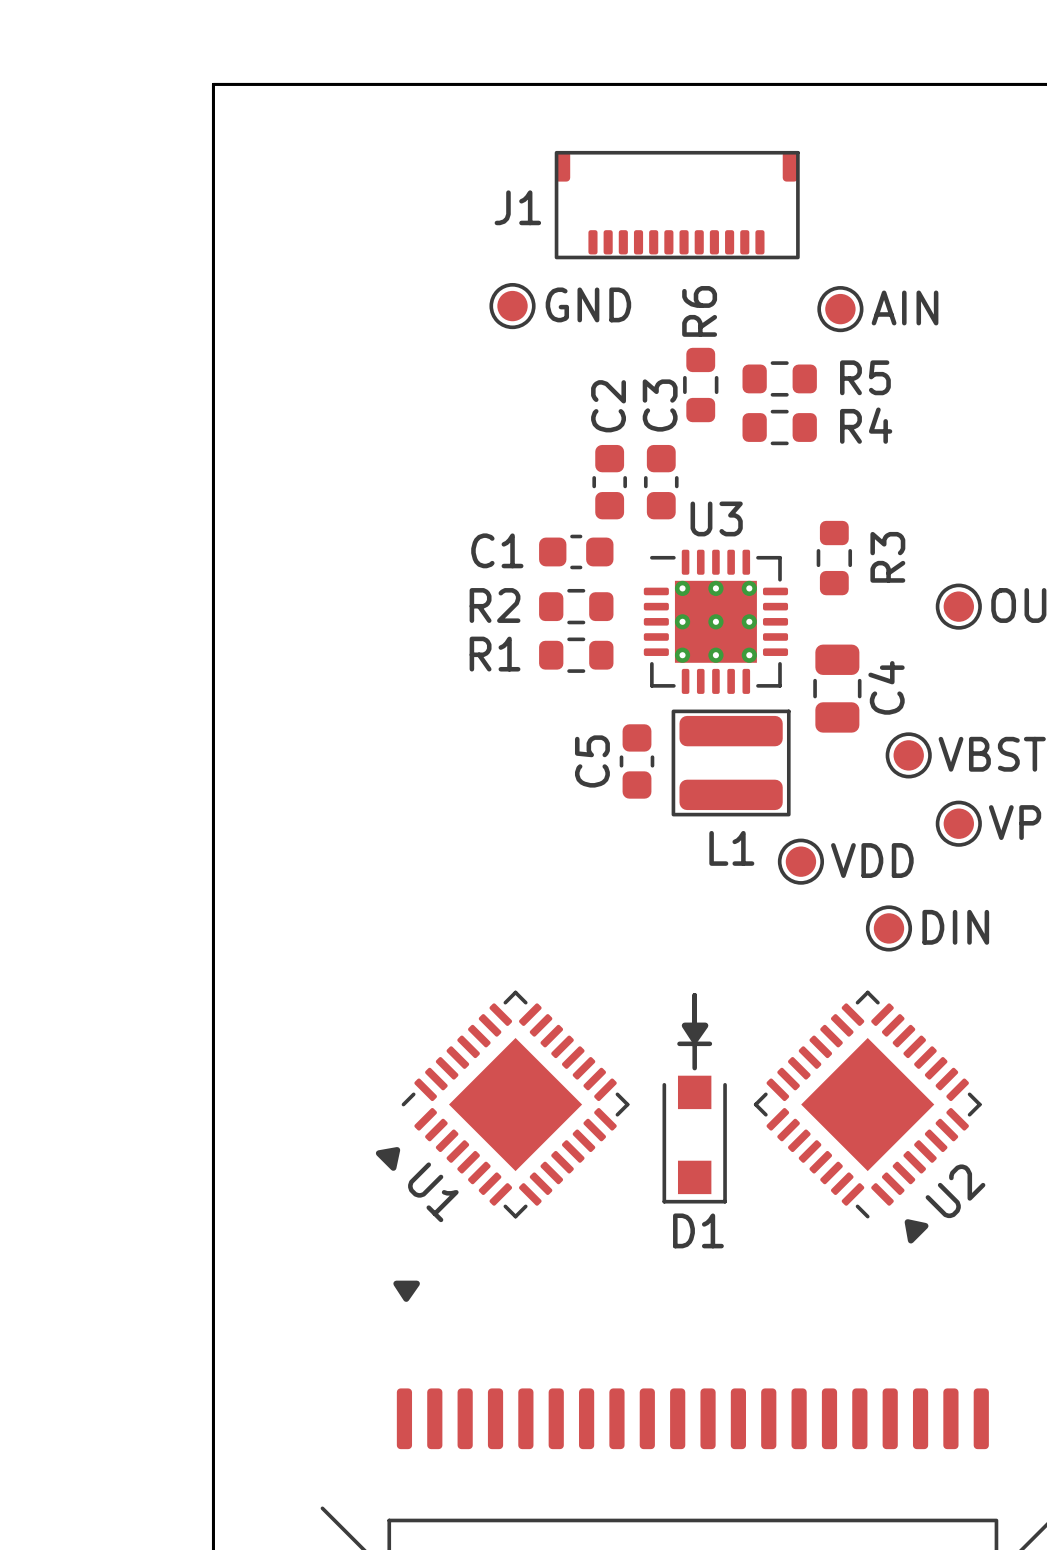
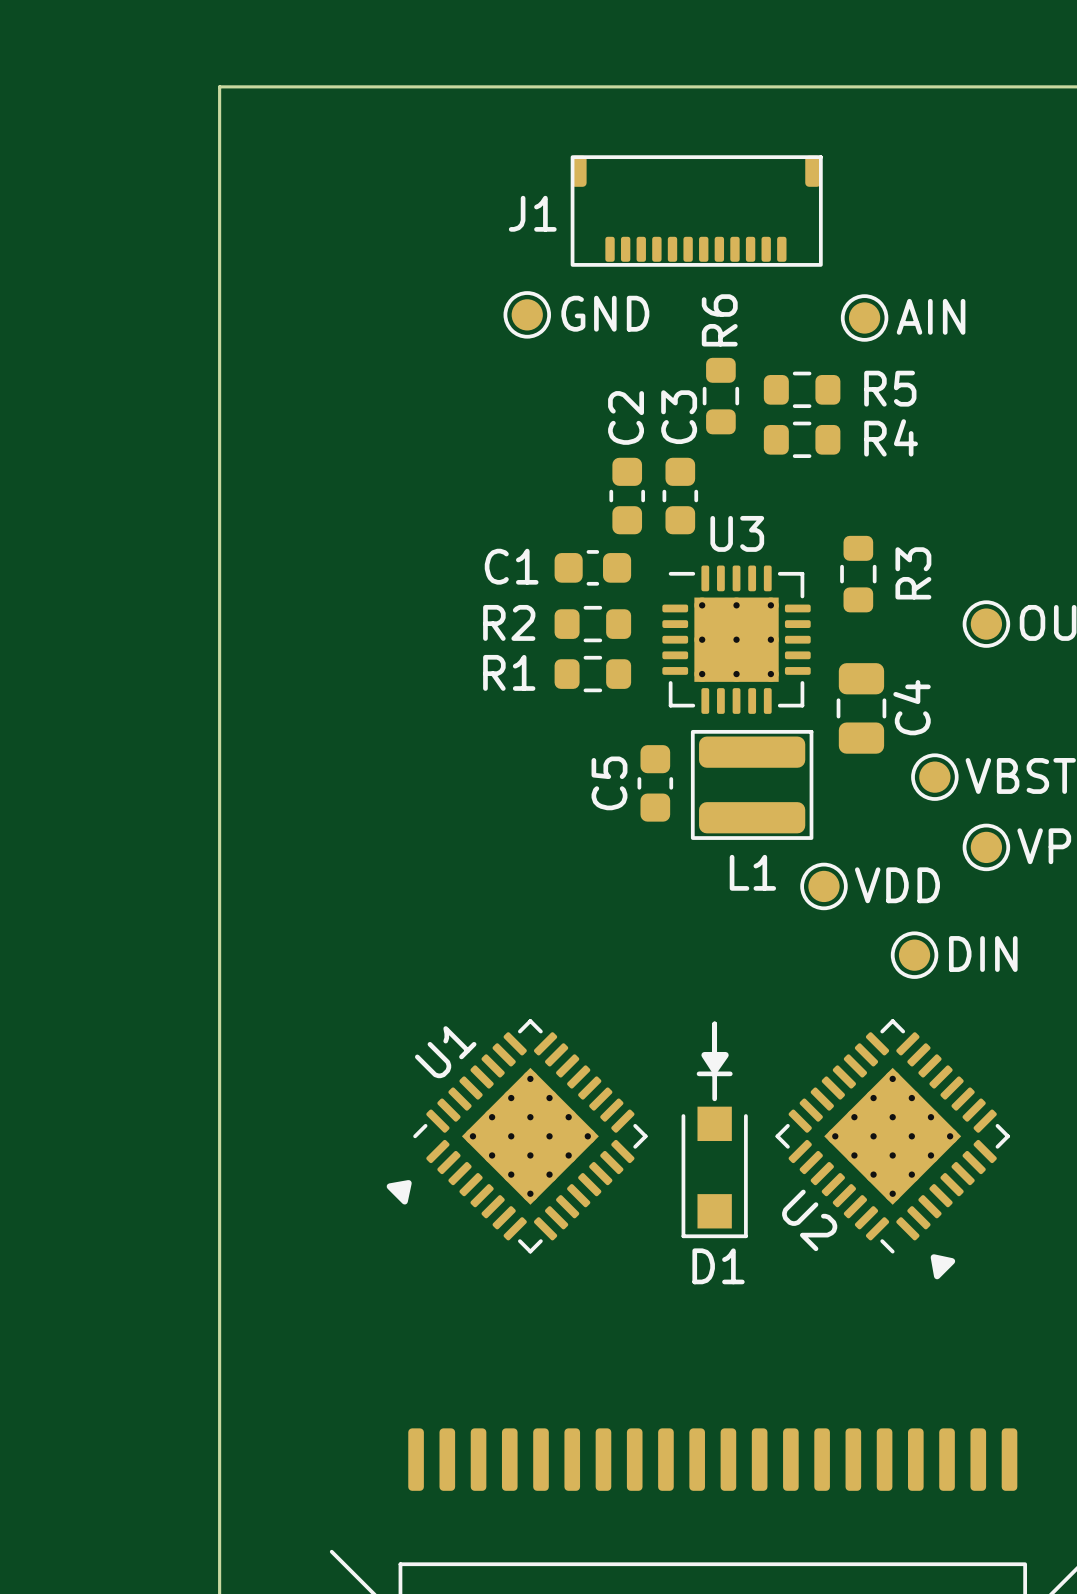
U1 footprint: [401, 990, 630, 1219] -> [413, 1019, 648, 1254]
U2 footprint: [753, 990, 982, 1219] -> [775, 1019, 1010, 1254]
U2 name position: U2 (955, 1191) -> U2 (809, 1220)
U1 name position: U1 (433, 1192) -> U1 (445, 1052)
drawing: [393, 1280, 420, 1302] -> none

